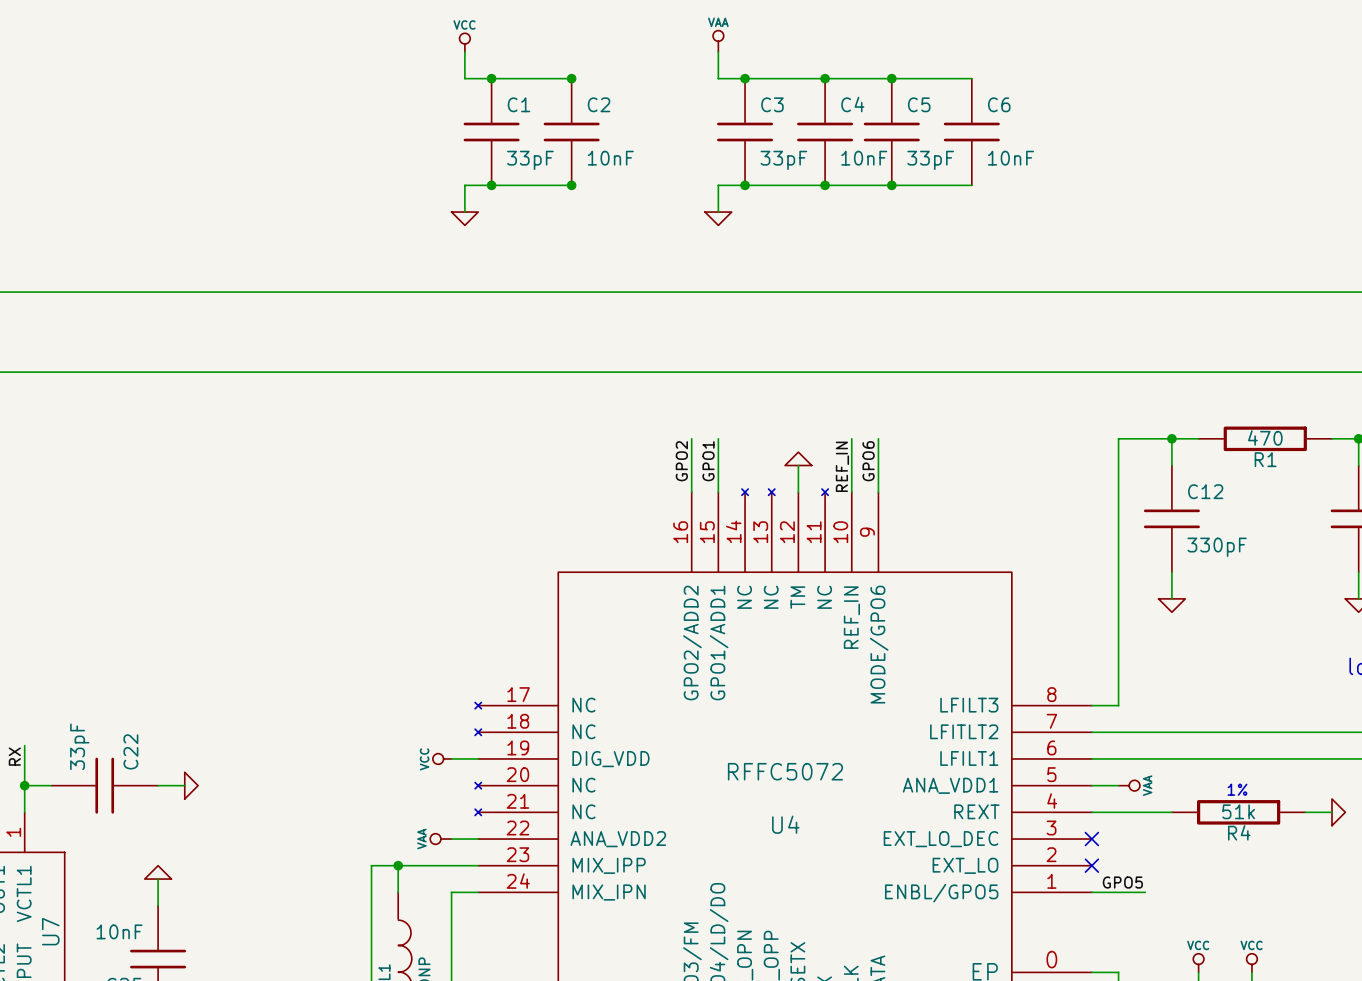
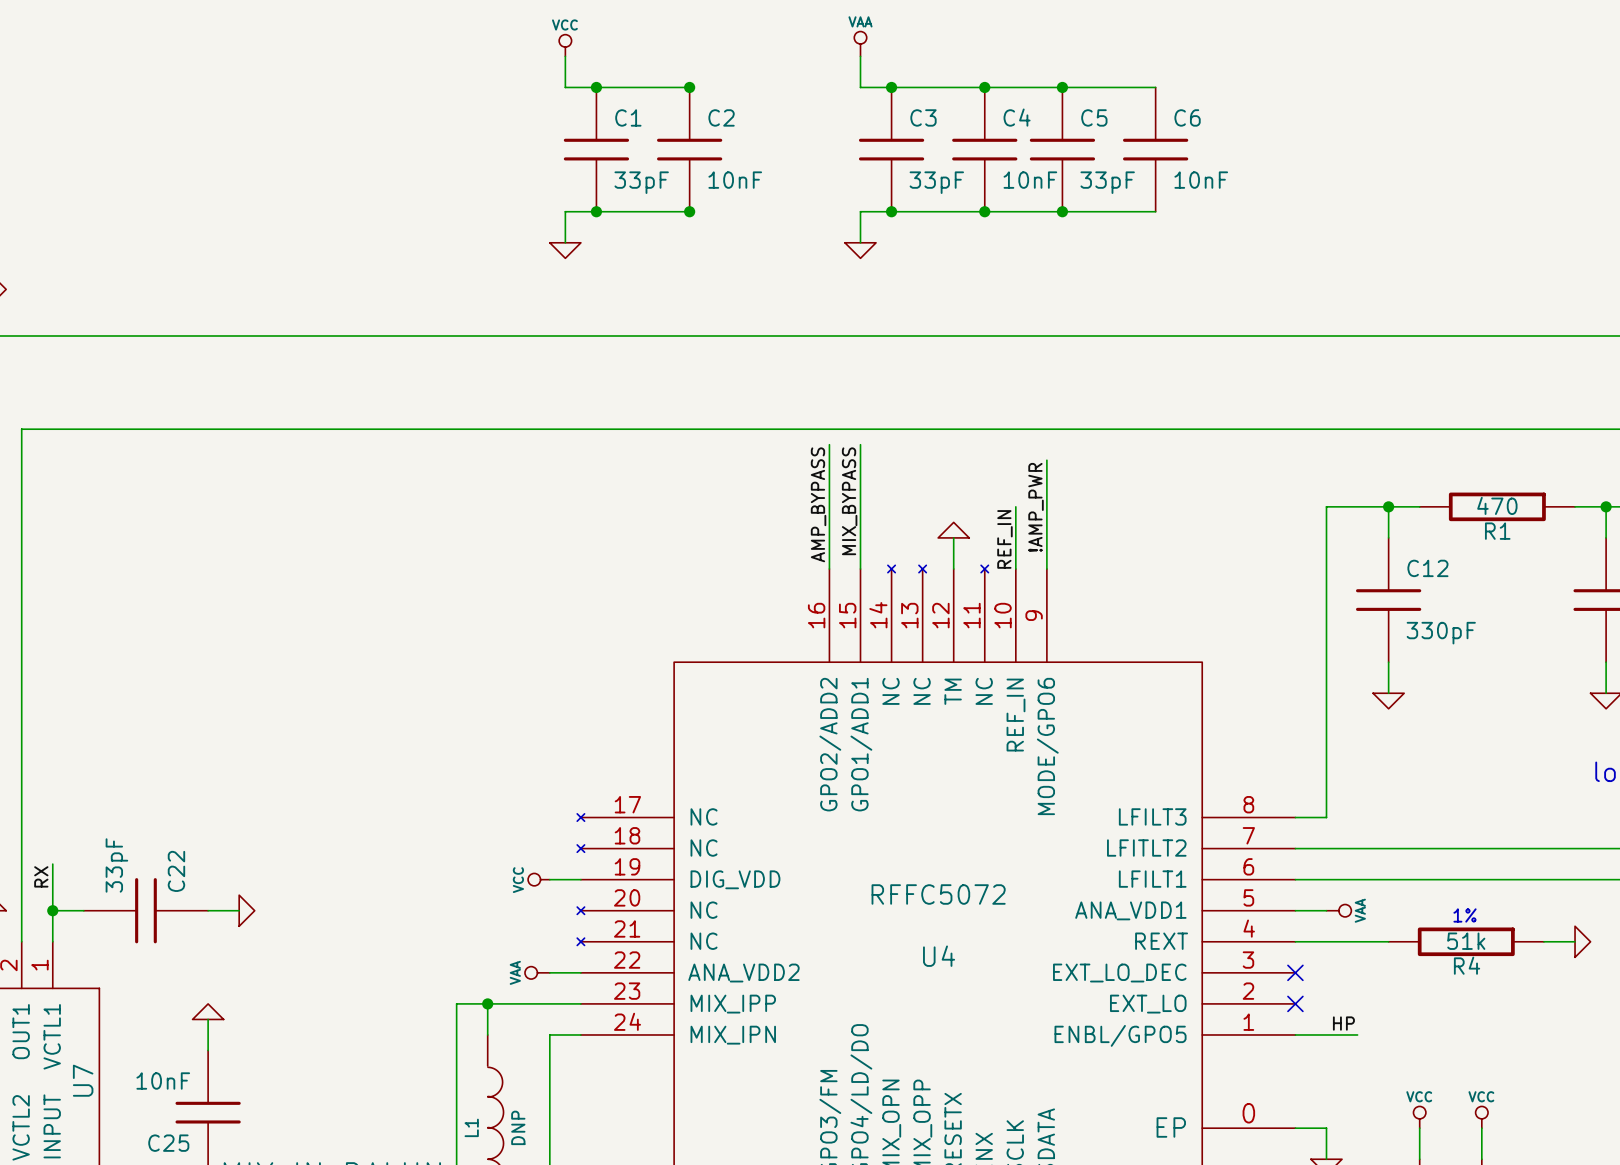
wire: none -> (829, 444) (829, 506)
wire: none -> (860, 444) (860, 506)
wire: none -> (1046, 460) (1046, 506)
label: none -> MIX_BYPASS (849, 501)
label: none -> AMP_BYPASS (818, 504)
label: none -> !AMP_PWR (1036, 507)
label: GPO2 (681, 461) -> none
label: GPO1 (708, 461) -> none
label: GPO6 (868, 461) -> none
label: GPO5 (1122, 882) -> HP (1343, 1023)

